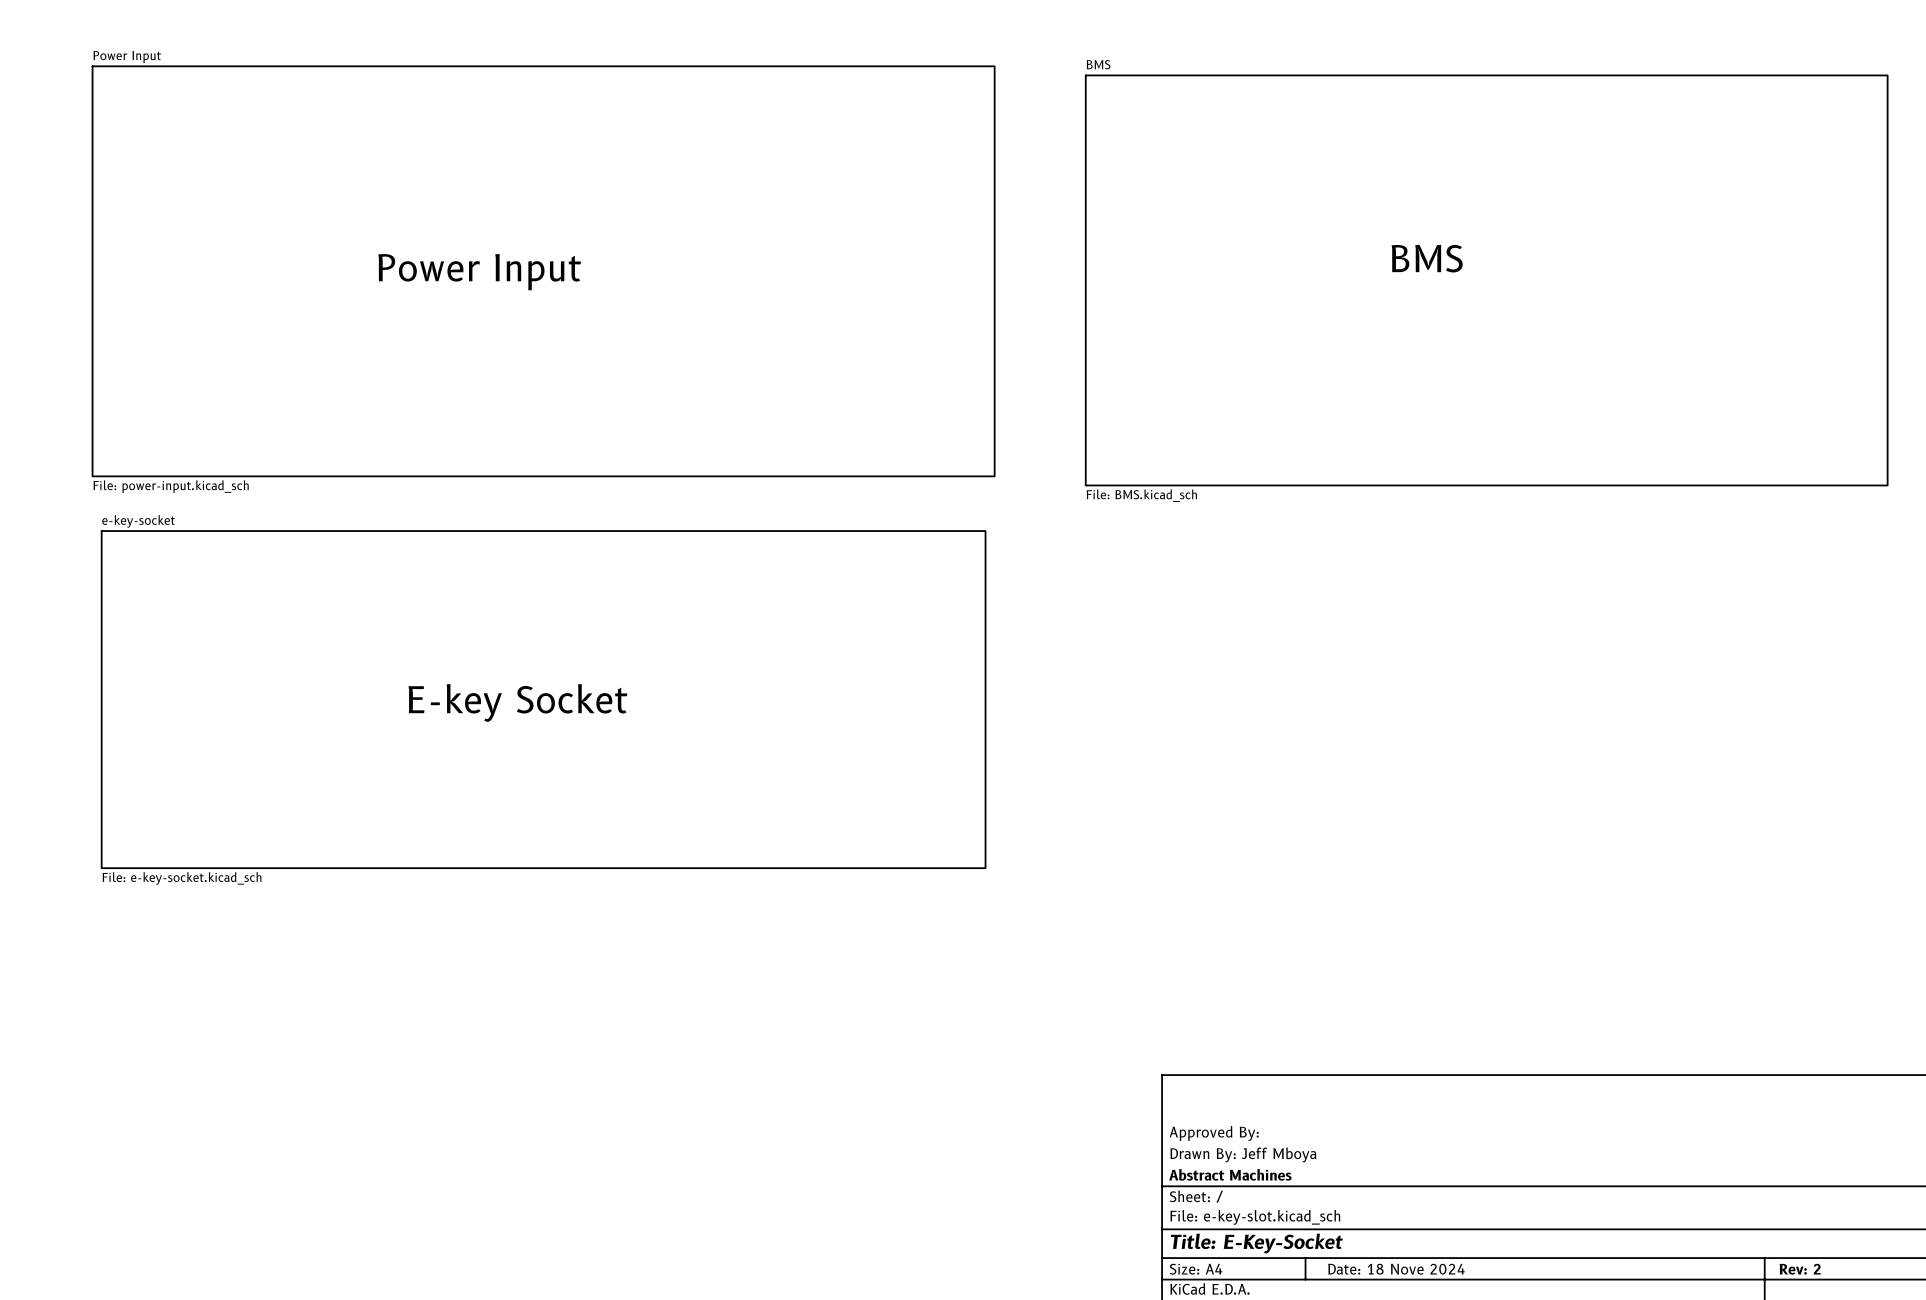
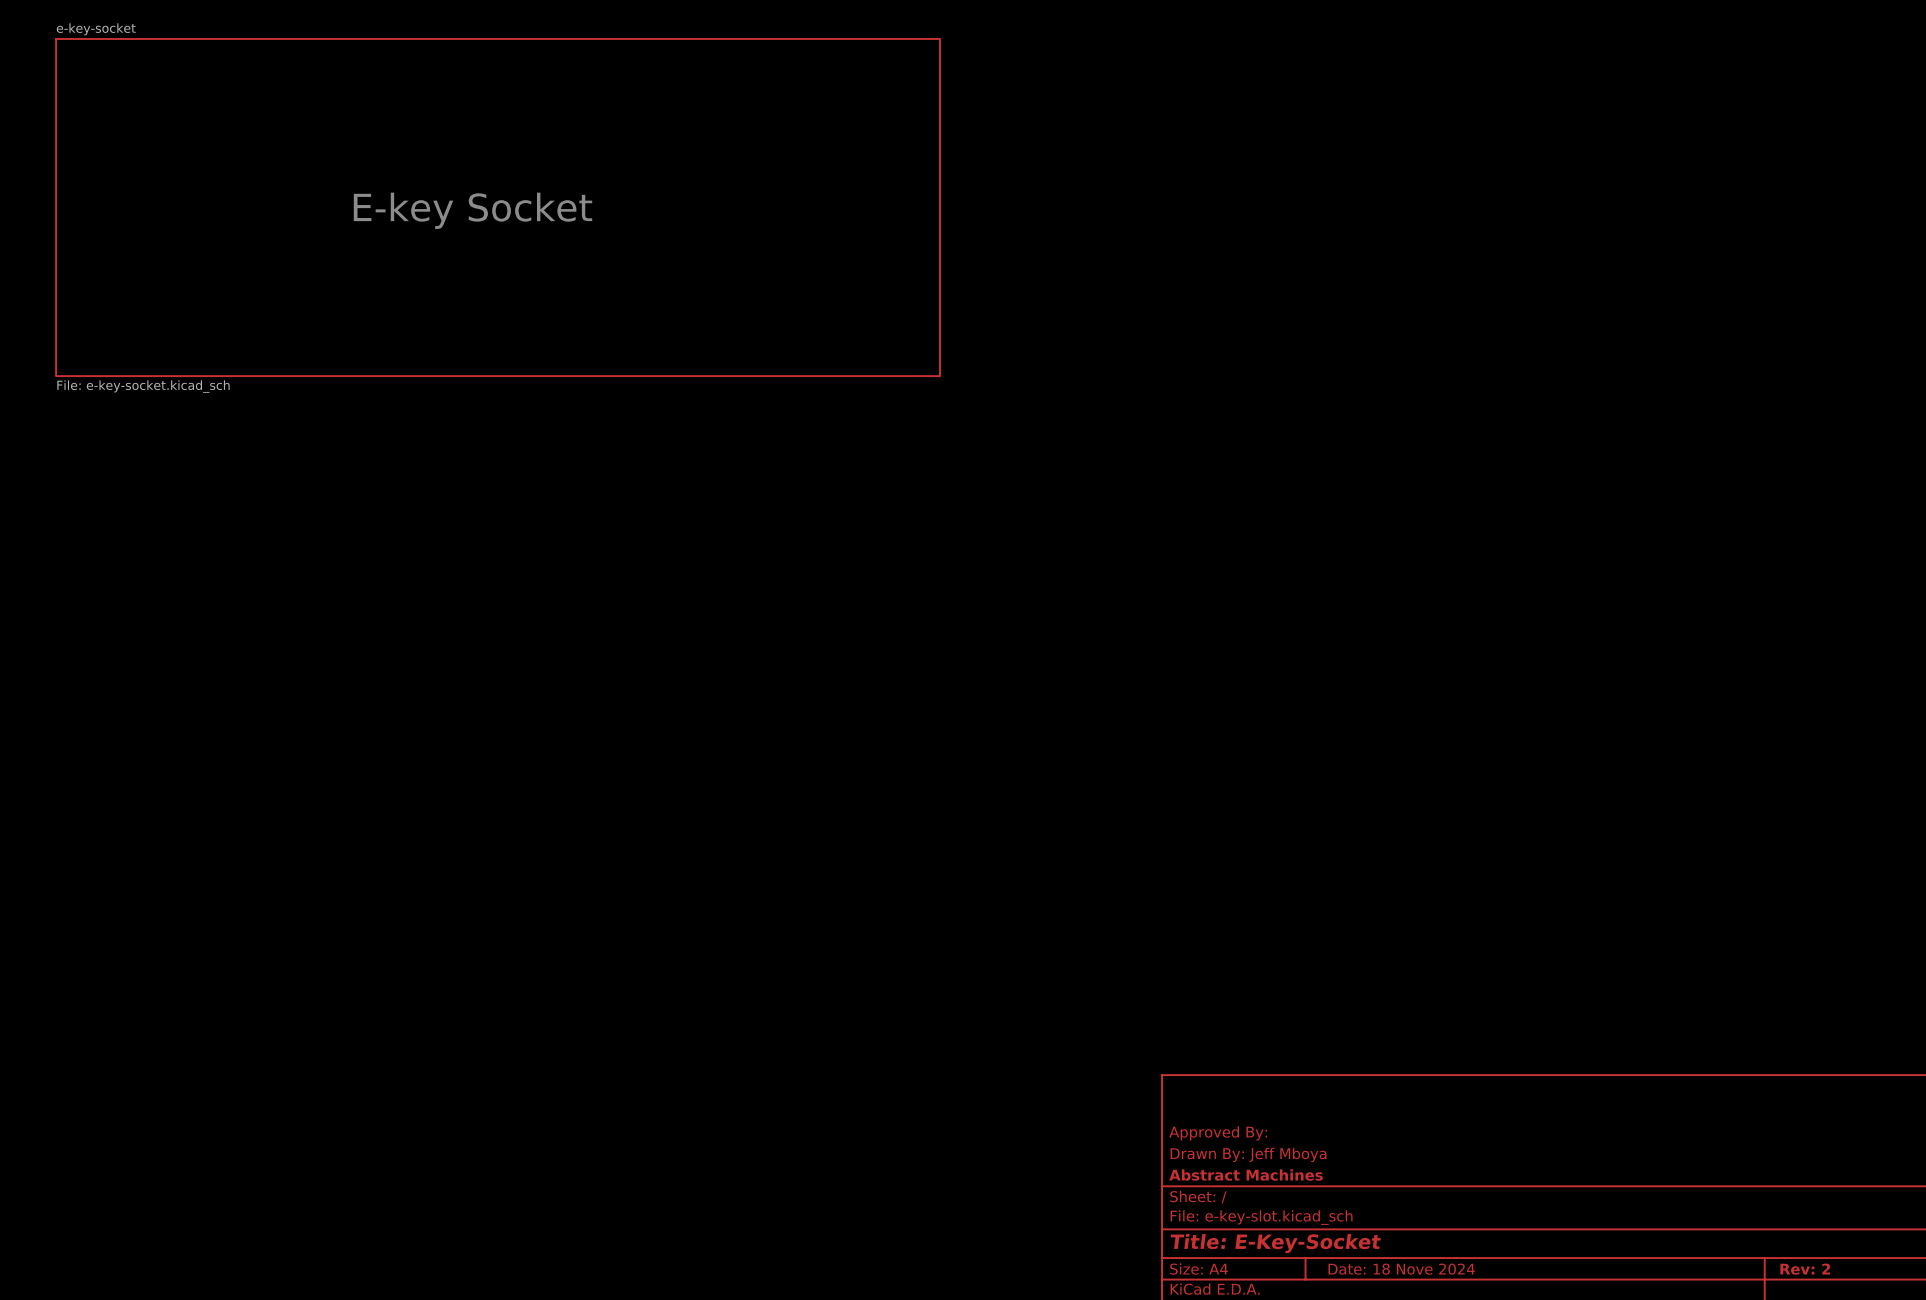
sheet e-key-socket: none -> File: e-key-socket.kicad_sch (498, 207)
text: none -> E-key Socket (473, 210)
text: BMS (1427, 258) -> none
sheet Power Input: File: power-input.kicad_sch (543, 271) -> none
text: Power Input (479, 272) -> none
sheet BMS: File: BMS.kicad_sch (1486, 280) -> none
sheet e-key-socket: File: e-key-socket.kicad_sch (543, 699) -> none
text: E-key Socket (517, 702) -> none

